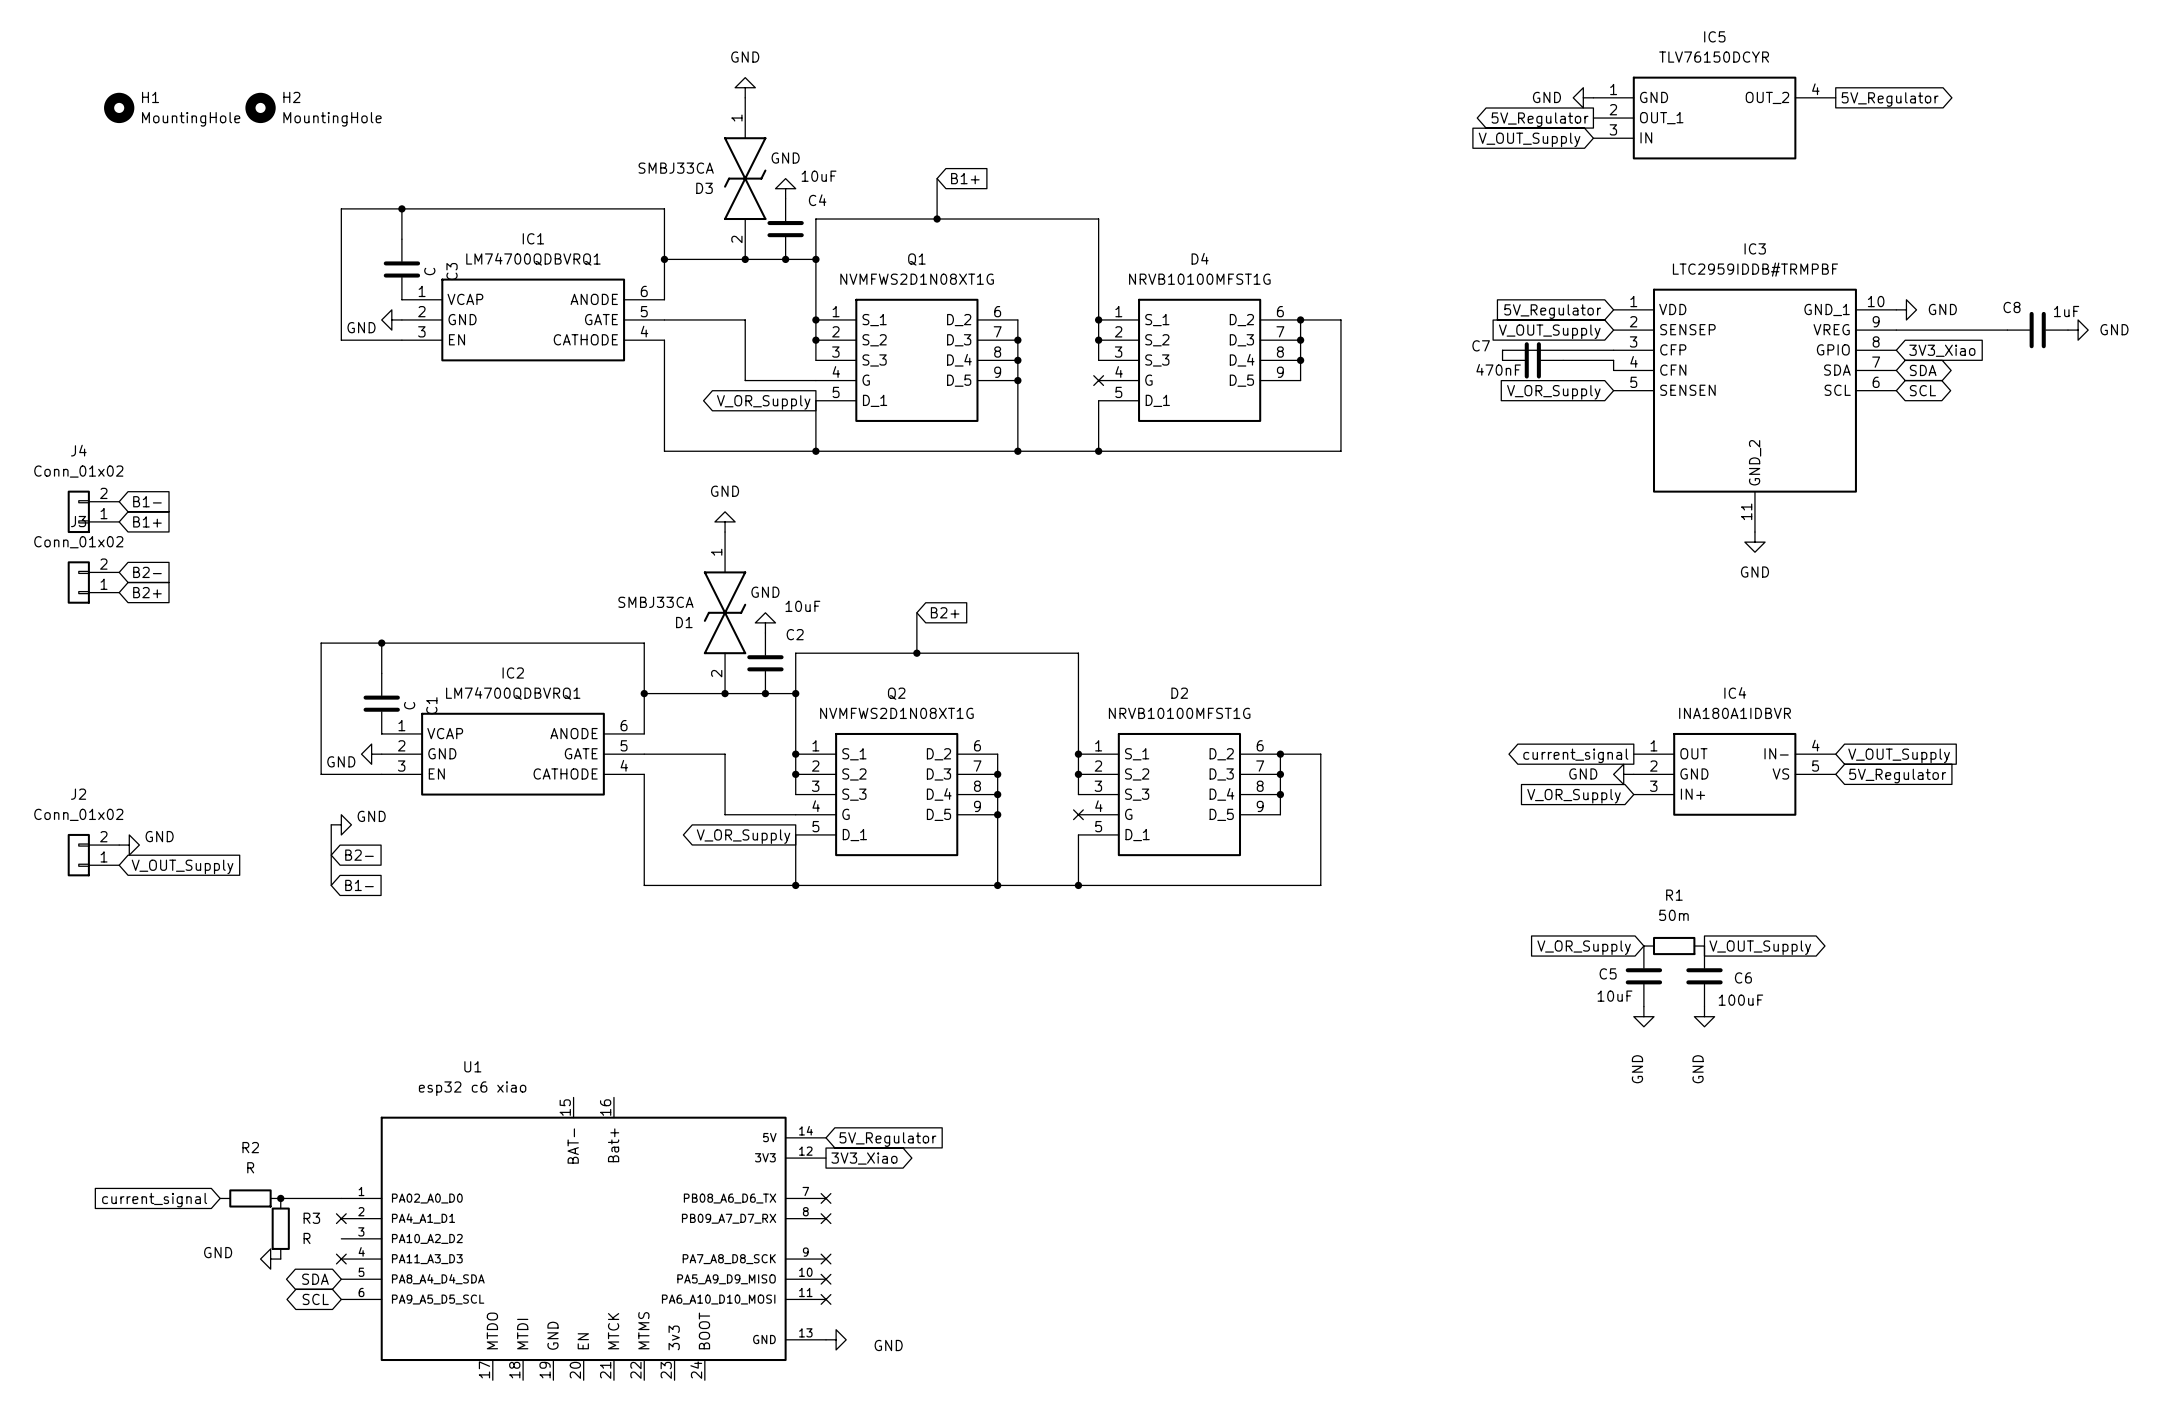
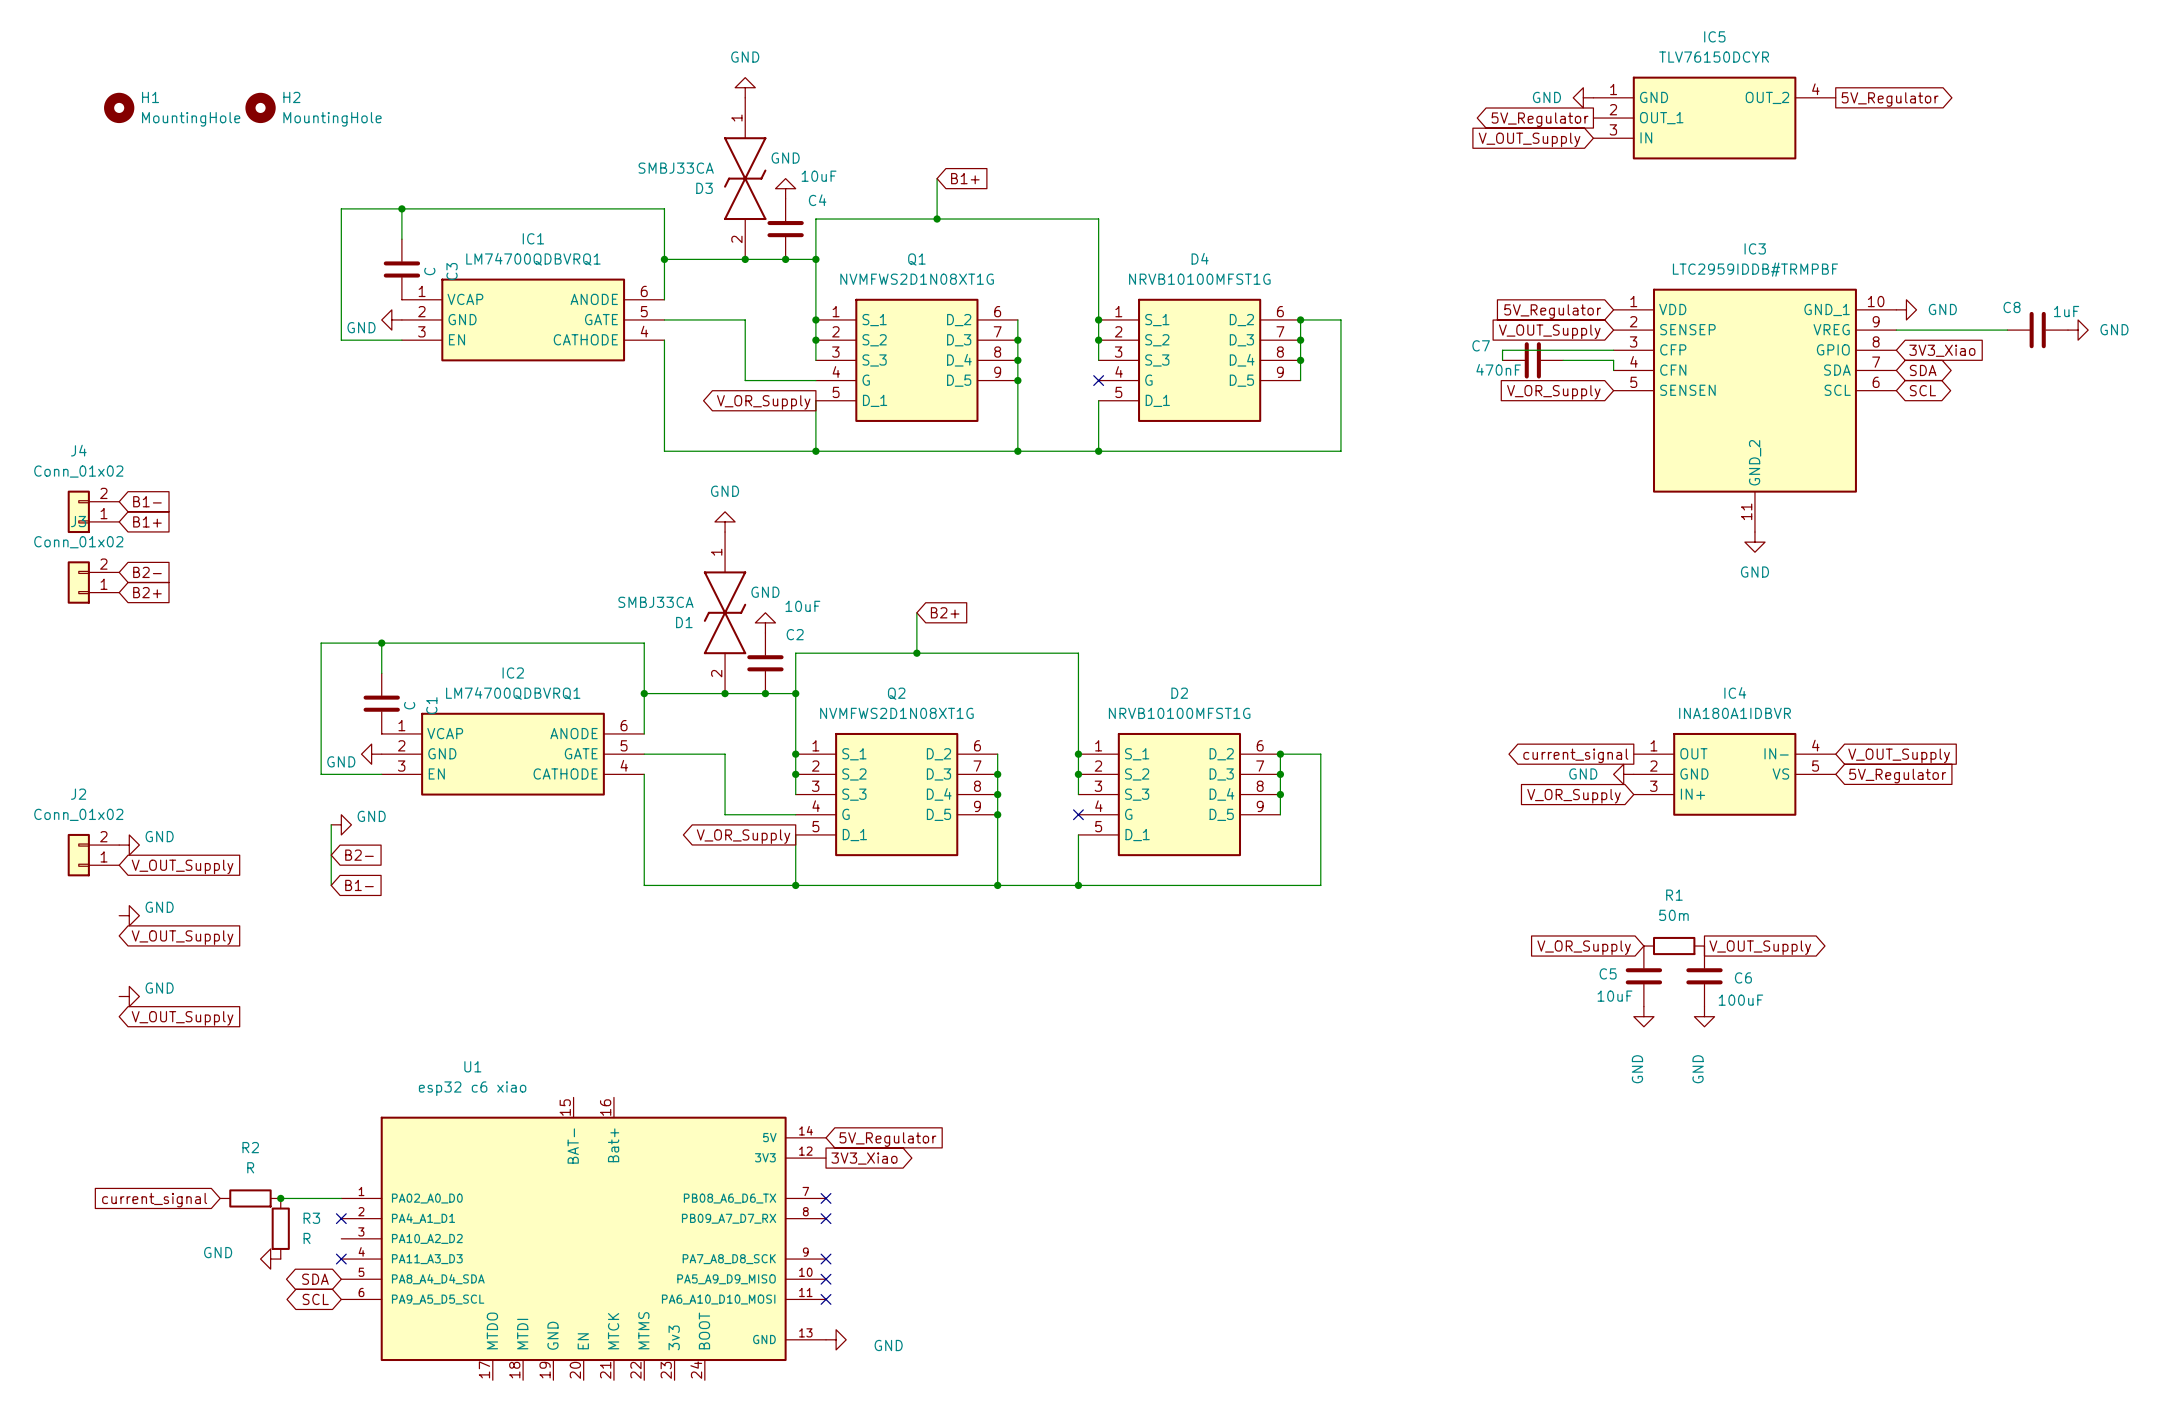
power symbol: none -> GND (129, 915)
global label: none -> V_OUT_Supply (182, 937)
power symbol: none -> GND (129, 996)
global label: none -> V_OUT_Supply (182, 1018)

